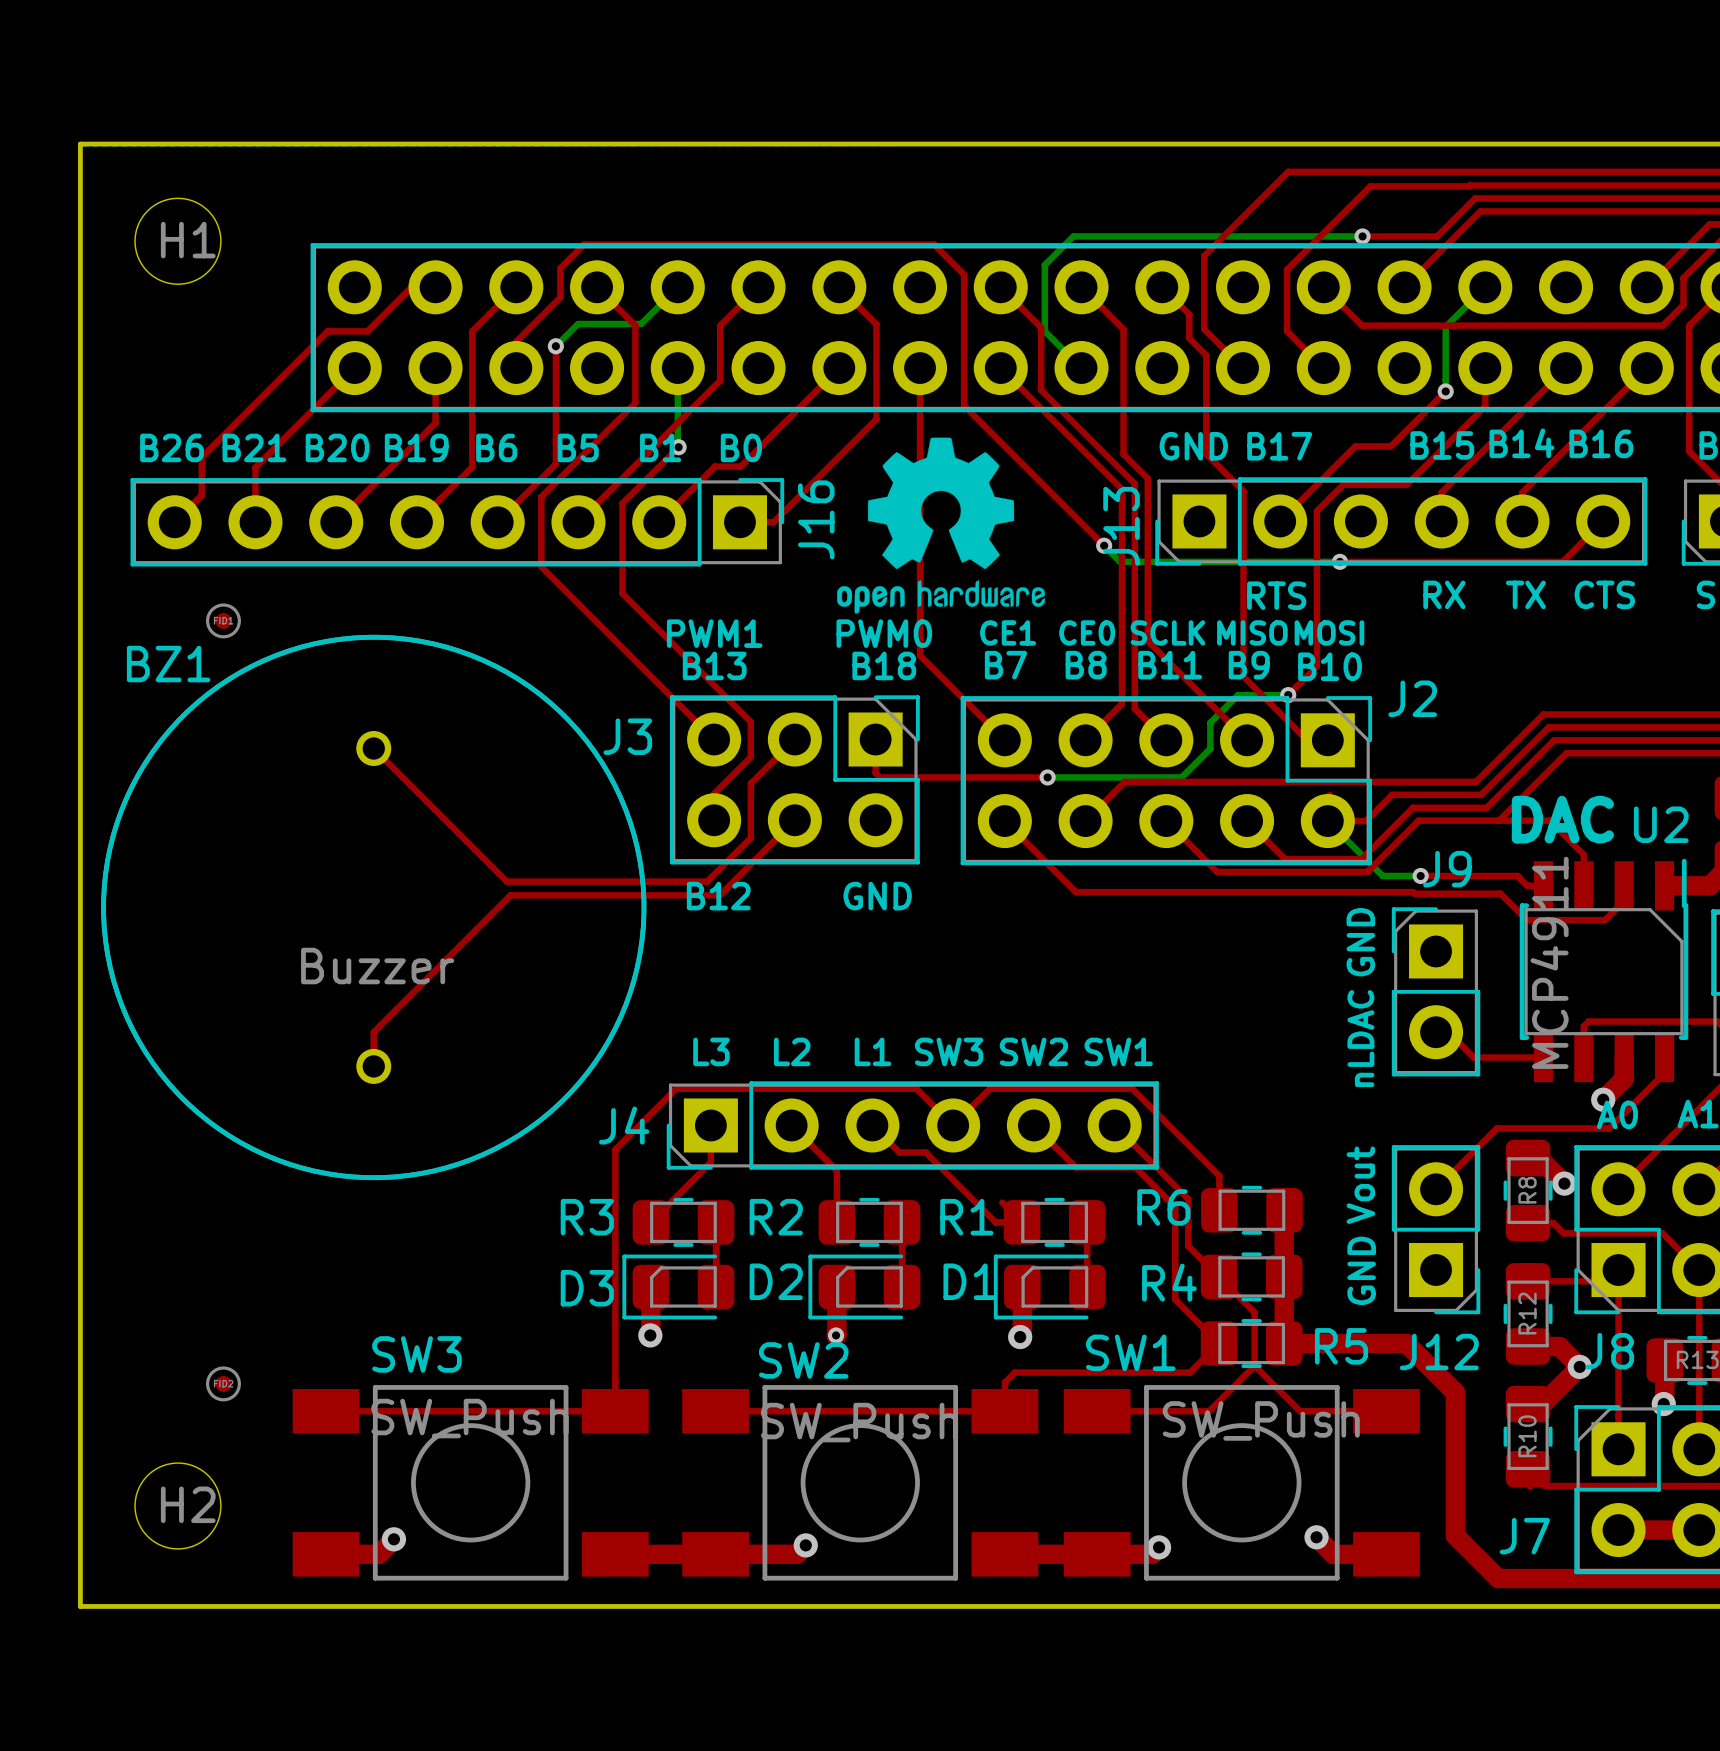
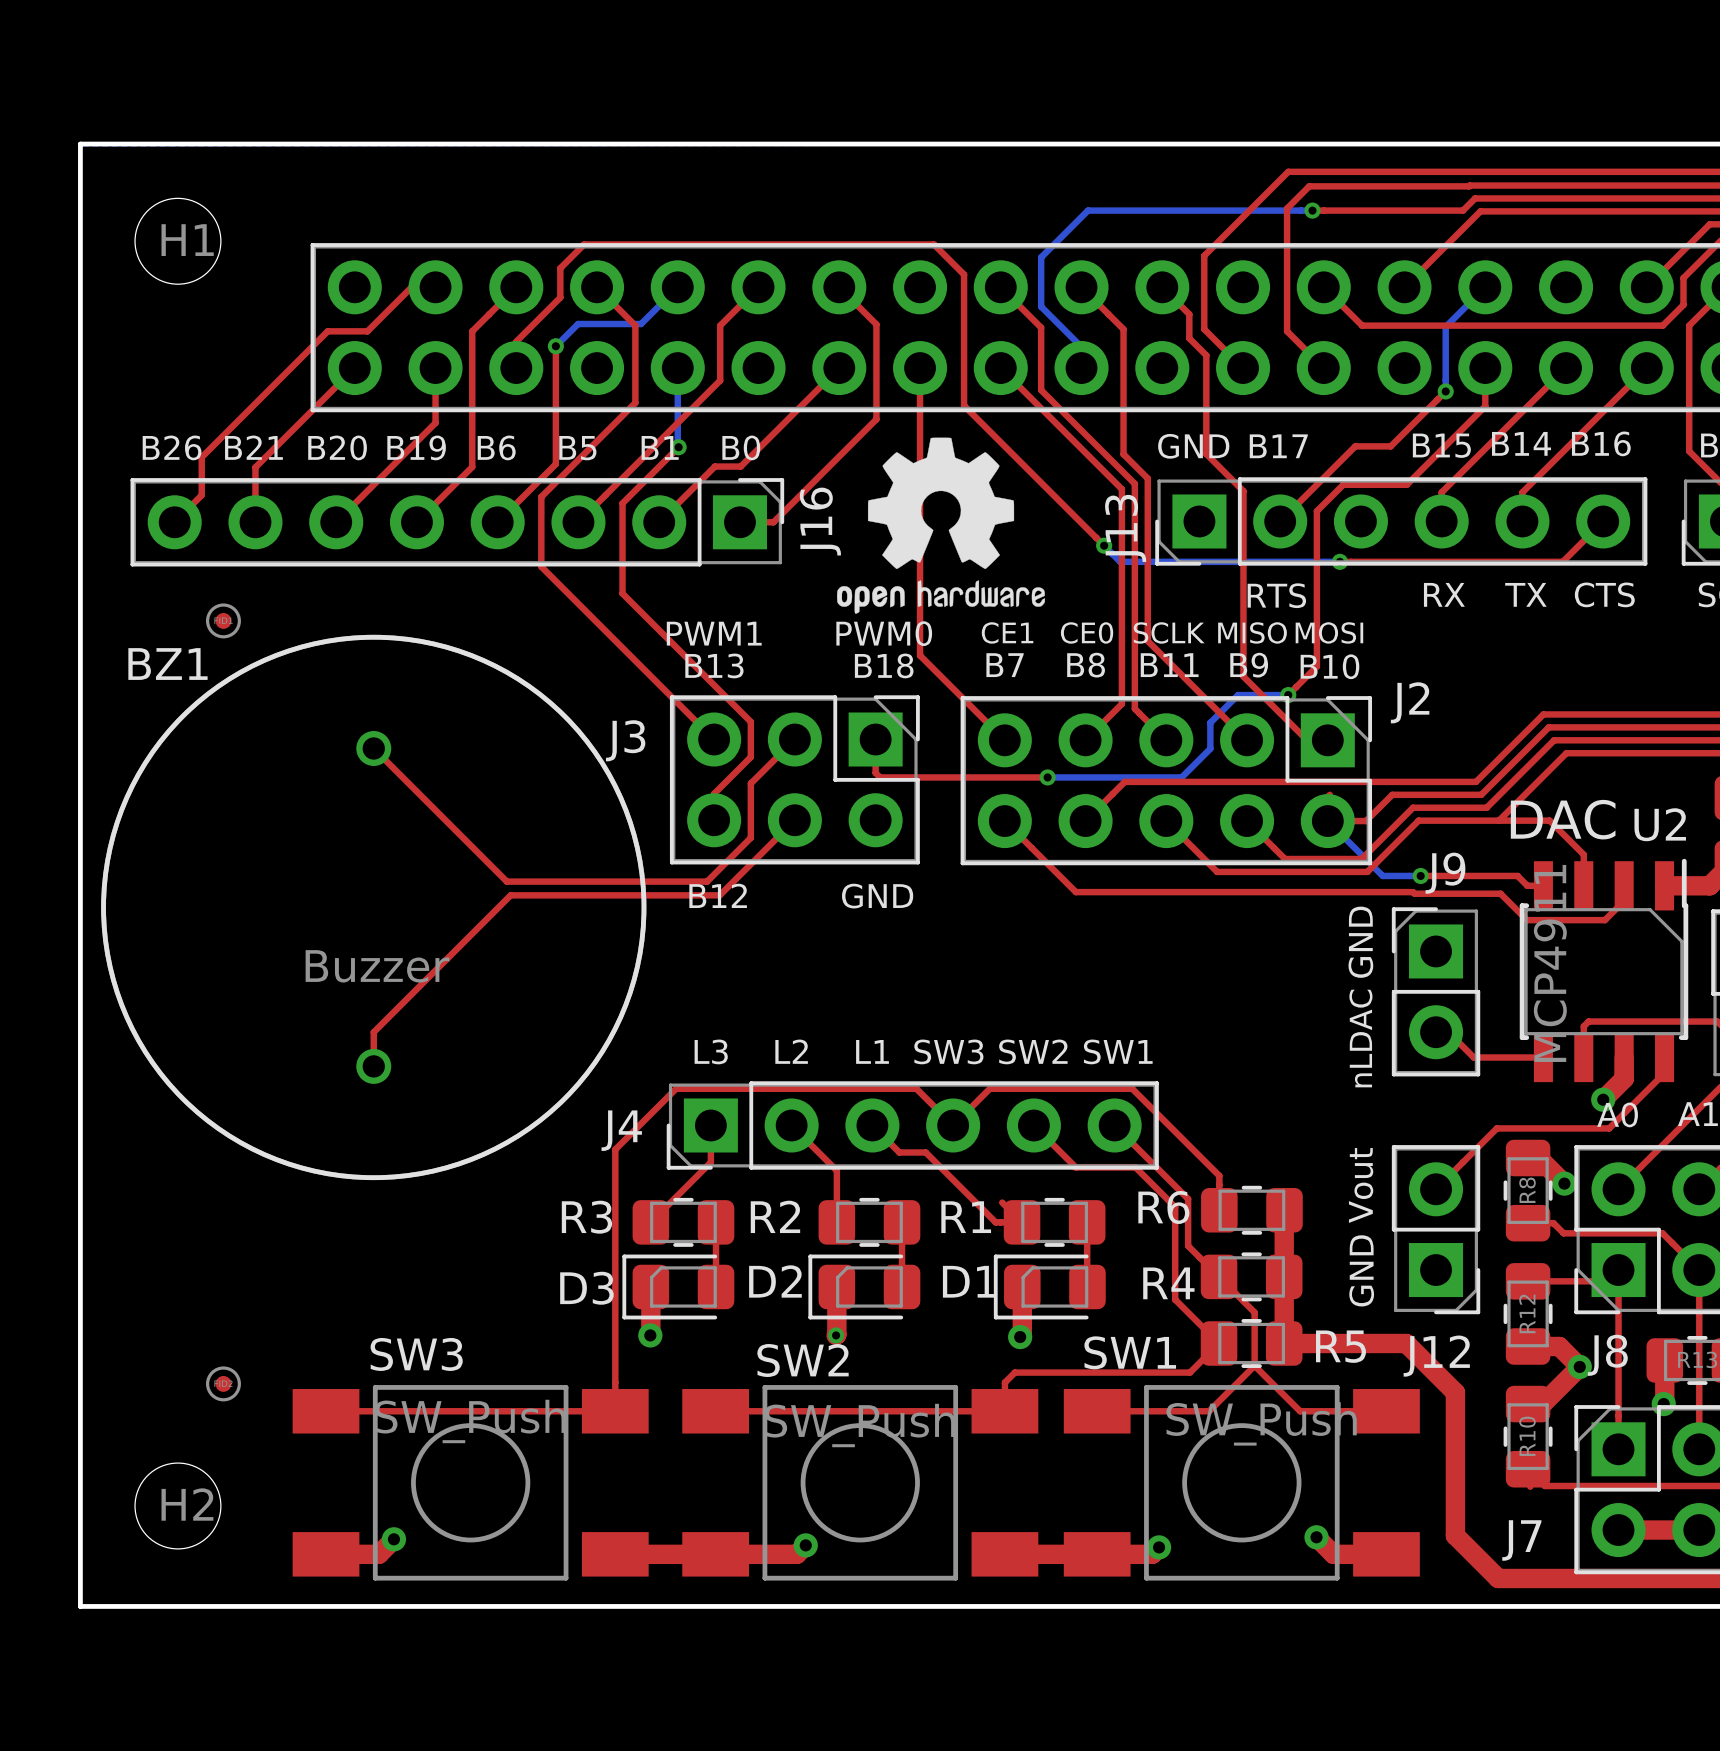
top track: (1370, 186) (1287, 269) -> (1370, 186) (1309, 186) (1287, 208) (1287, 269)
top track: (1462, 210) (1437, 236) (1362, 236) -> (1462, 210) (1312, 210)
bottom track: (1362, 236) (1073, 236) (1044, 265) (1044, 331) (1081, 368) -> (1312, 210) (1088, 210) (1041, 257) (1041, 306) (1081, 347) (1081, 368)
via position: (1362, 236) -> (1312, 210)

